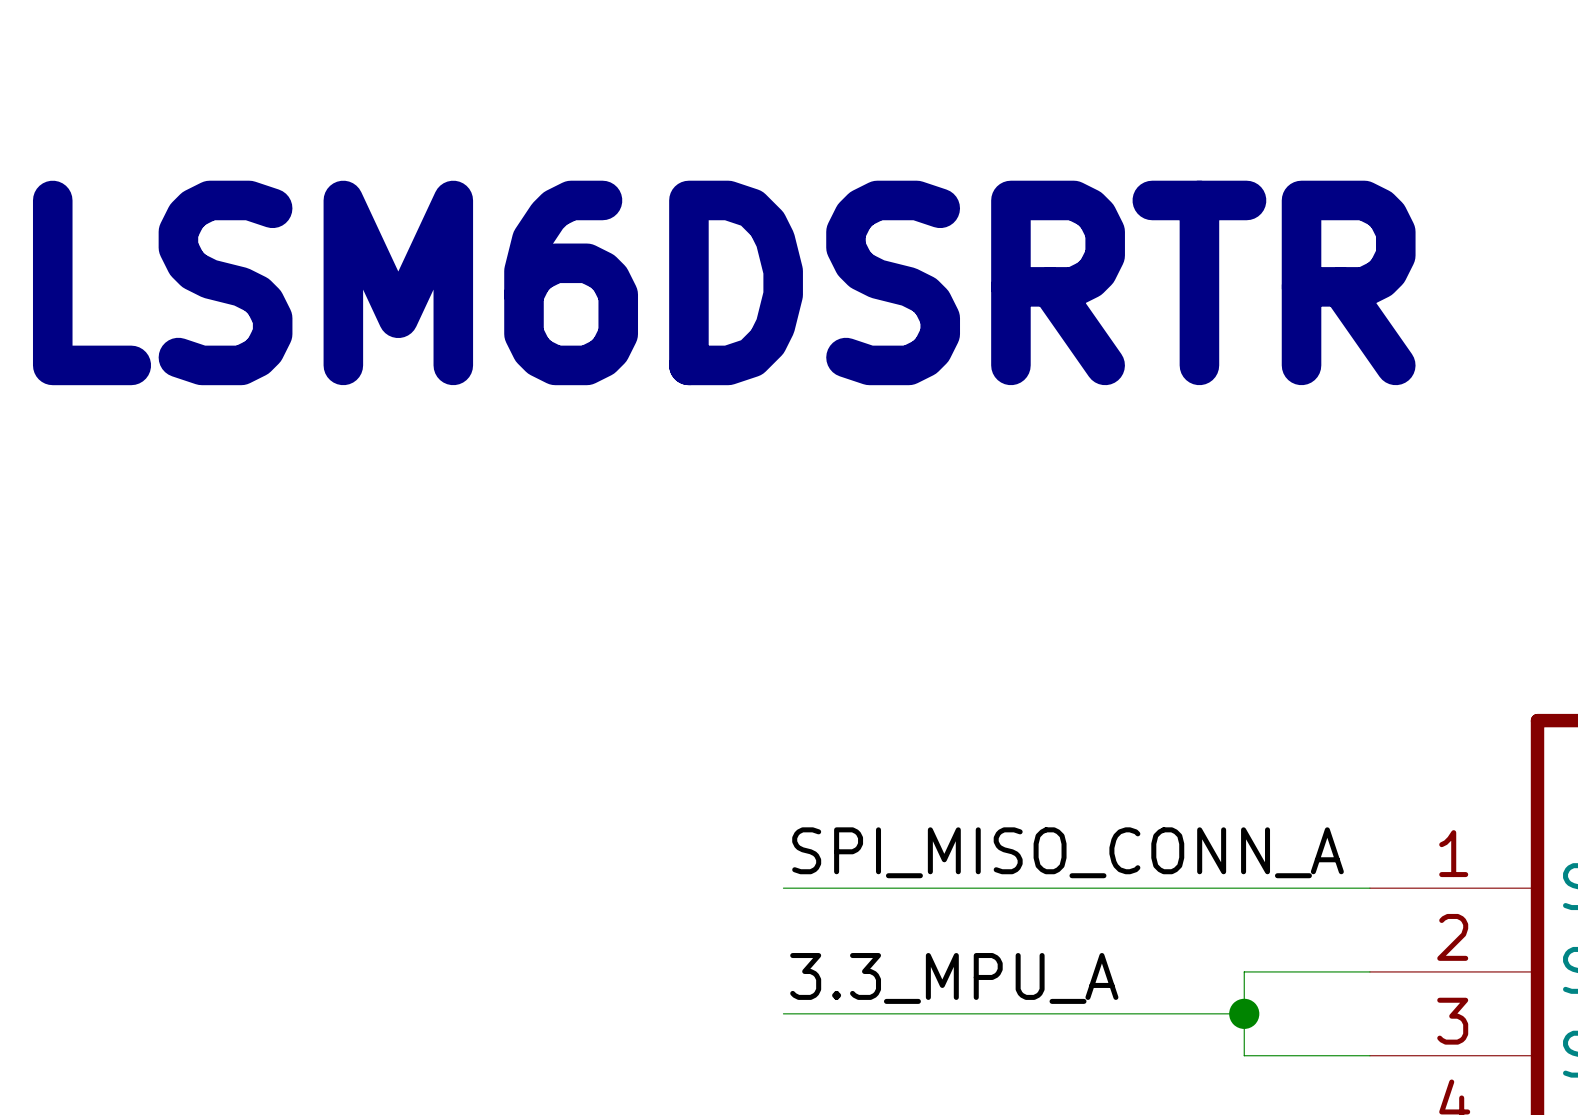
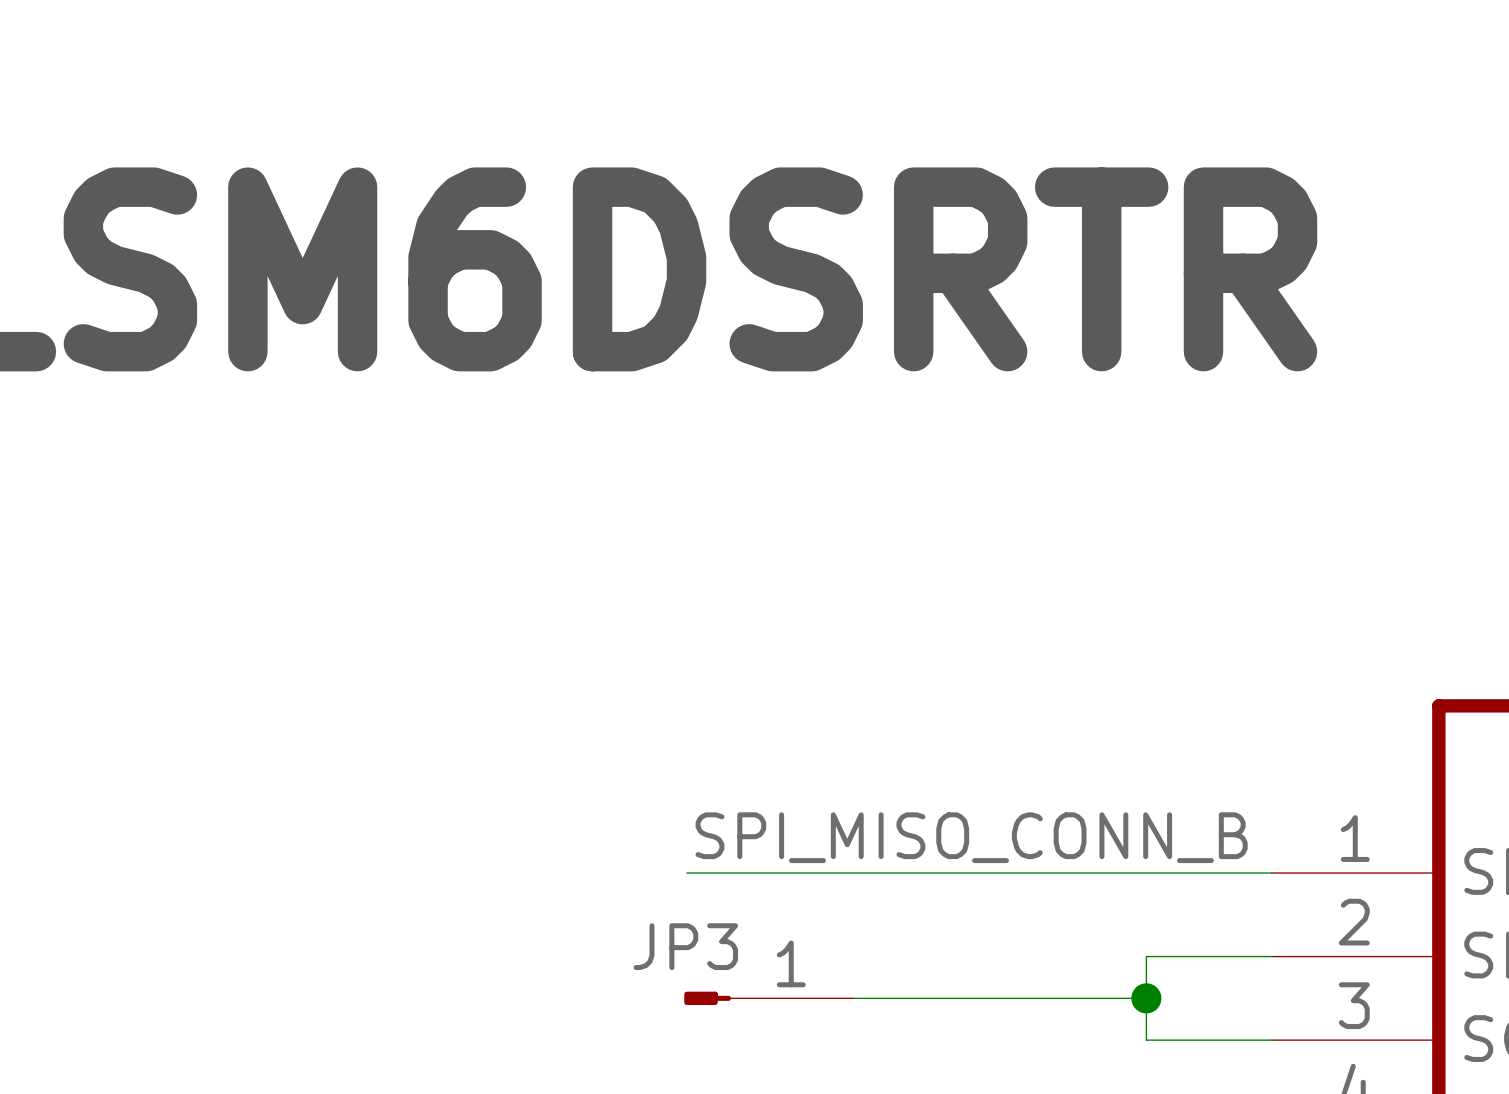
label: SPI_MISO_CONN_A (1068, 852) -> SPI_MISO_CONN_B (971, 837)
label: 3.3_MPU_A (954, 978) -> none
JP3: none -> (769, 998)

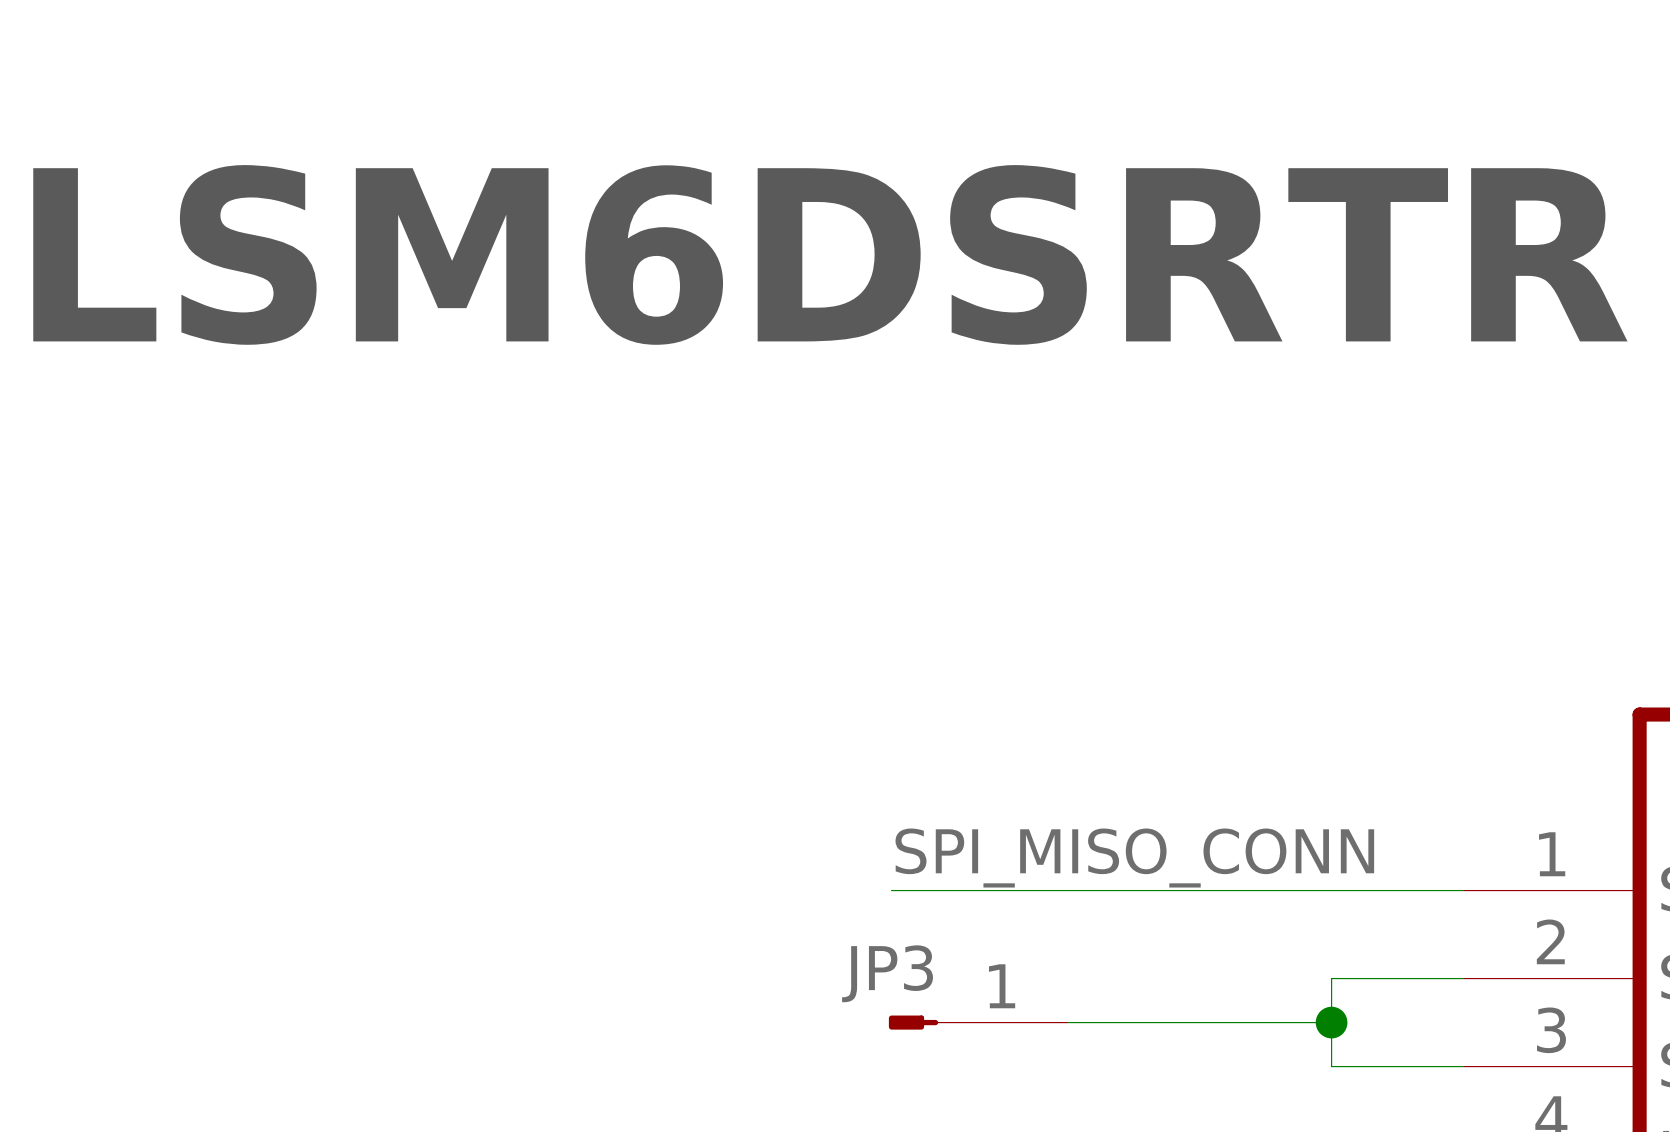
label: SPI_MISO_CONN_B (971, 837) -> SPI_MISO_CONN (1134, 858)
wire: (686, 873) (728, 873) -> none
JP3 position: (769, 998) -> (978, 1022)

